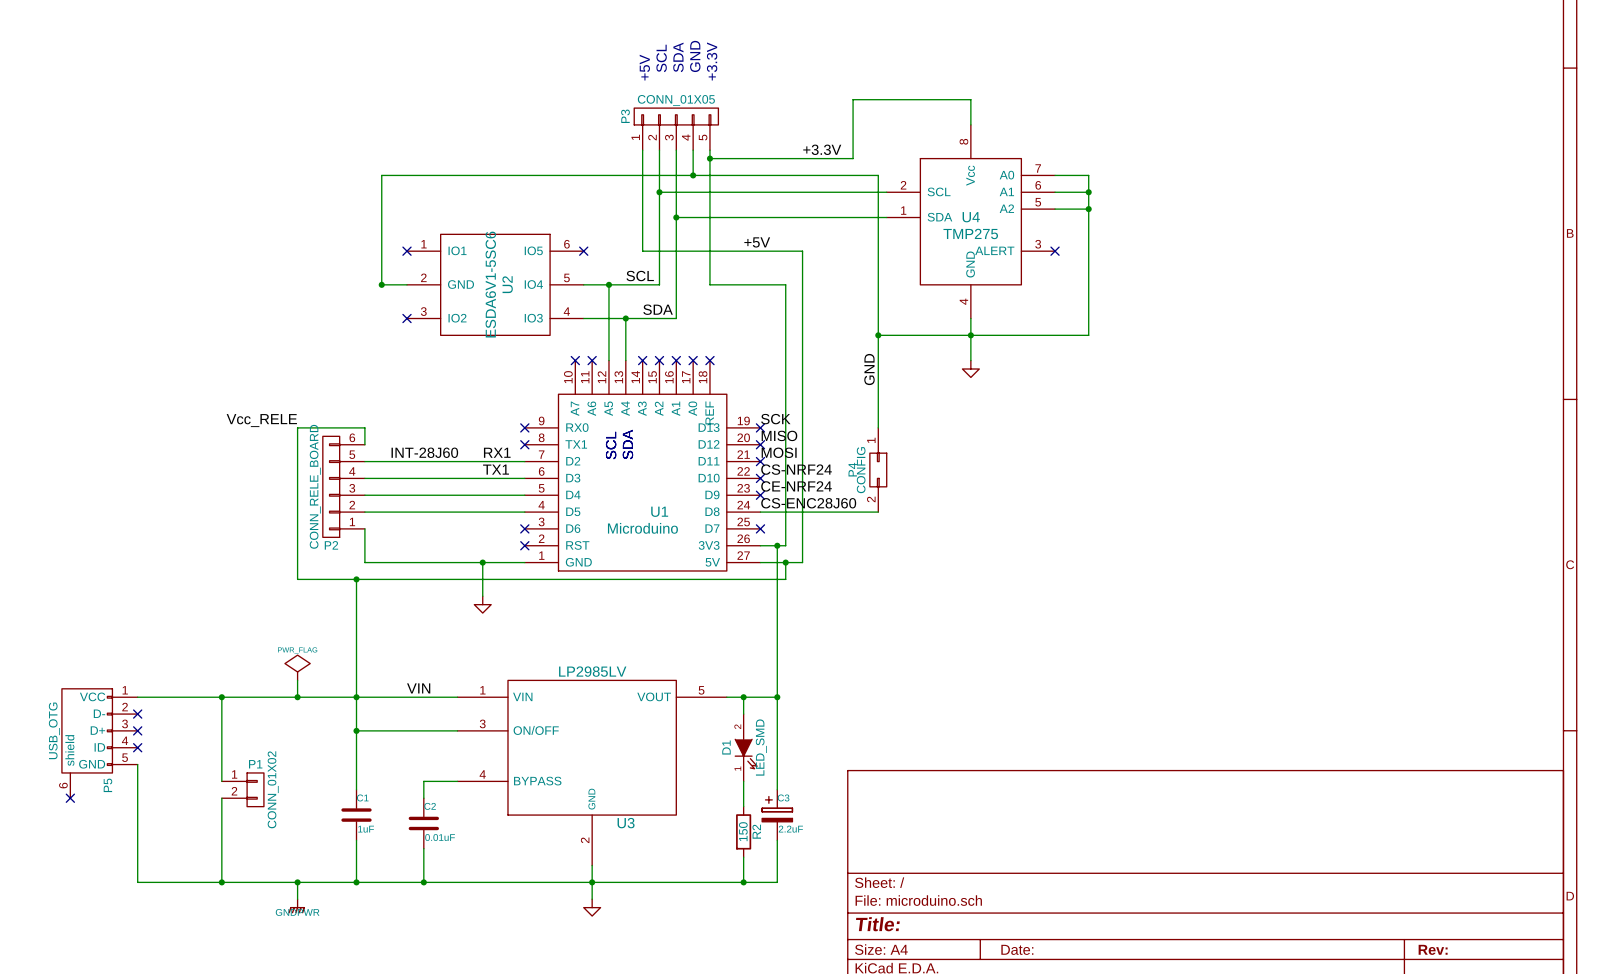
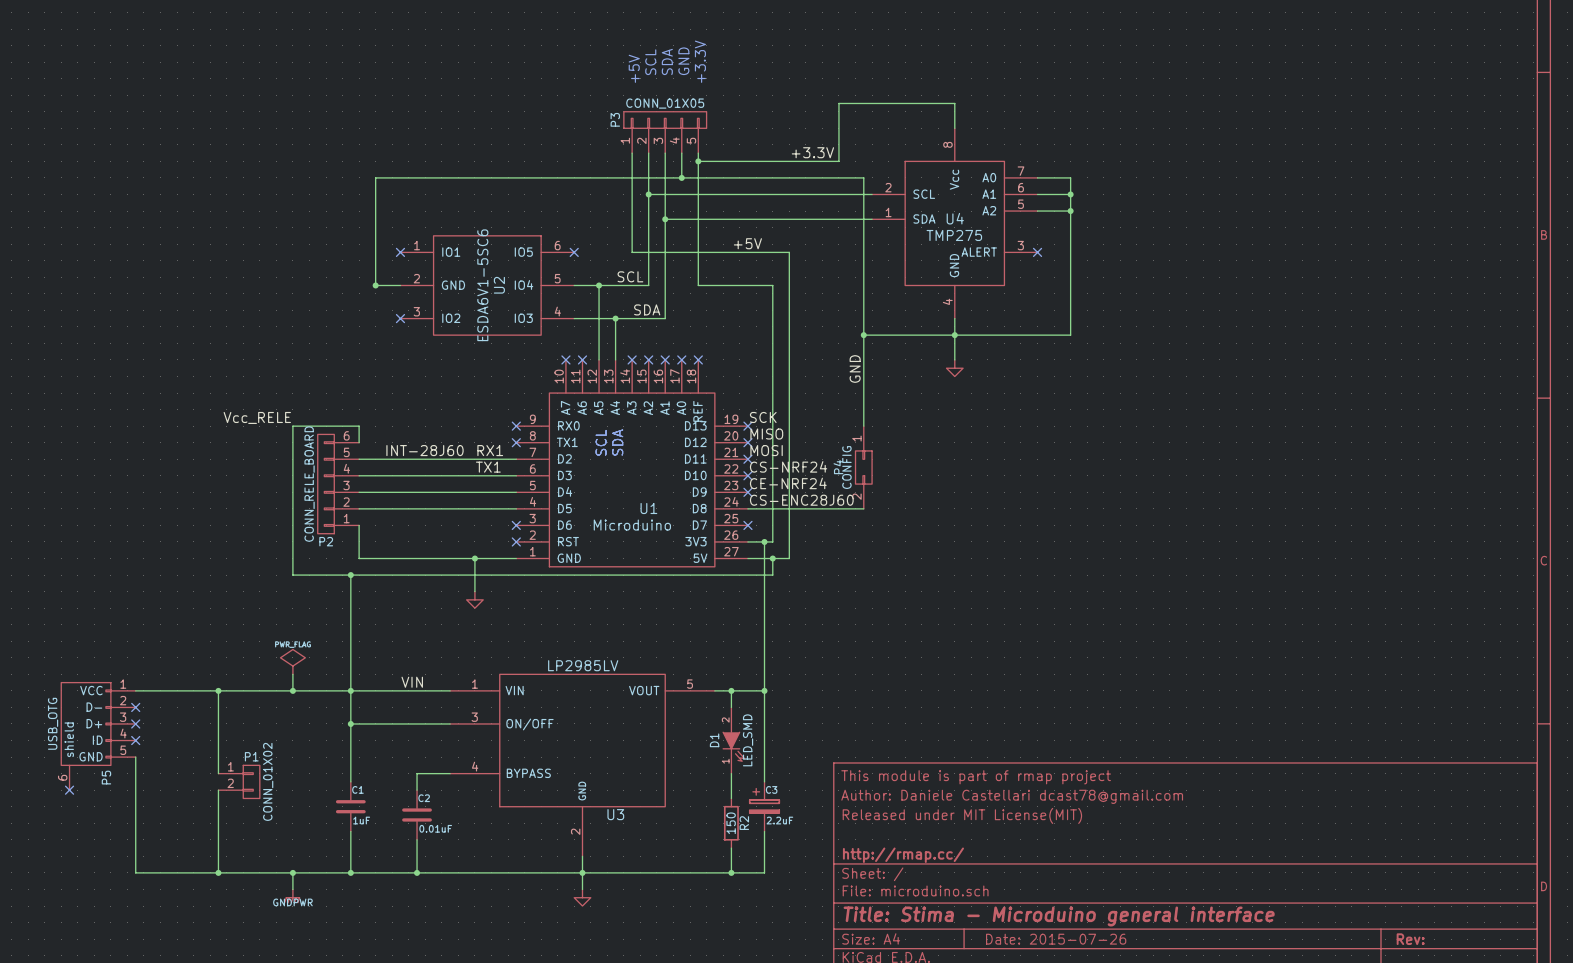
title block: none -> This module is part of rmap project (976, 777)
title block: none -> Author: Daniele Castellari dcast78@gmail.com (1012, 796)
title block: none -> Released under MIT License(MIT) (962, 815)
title block: none -> http://rmap.cc/ (903, 855)
title block: Title: (877, 924) -> Title: Stima - Microduino general interface (1059, 916)
title block: Date: (1017, 949) -> Date: 2015-07-26 (1056, 939)

